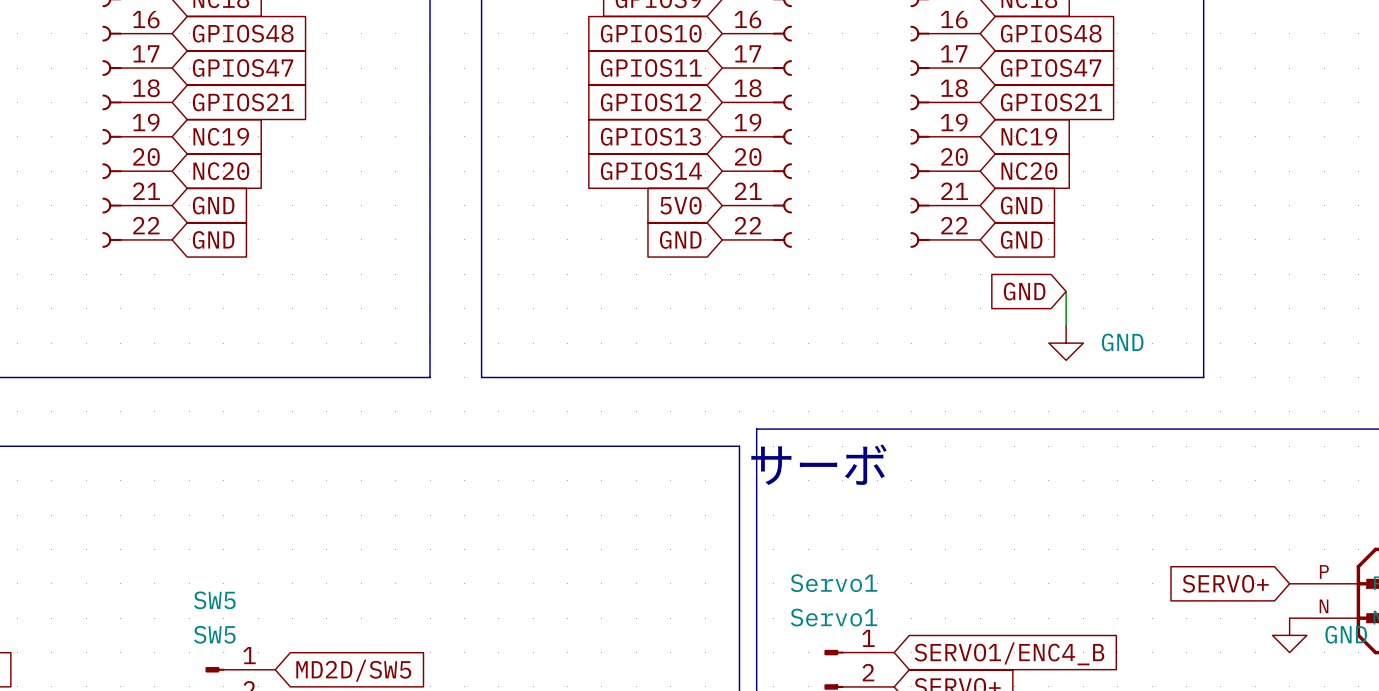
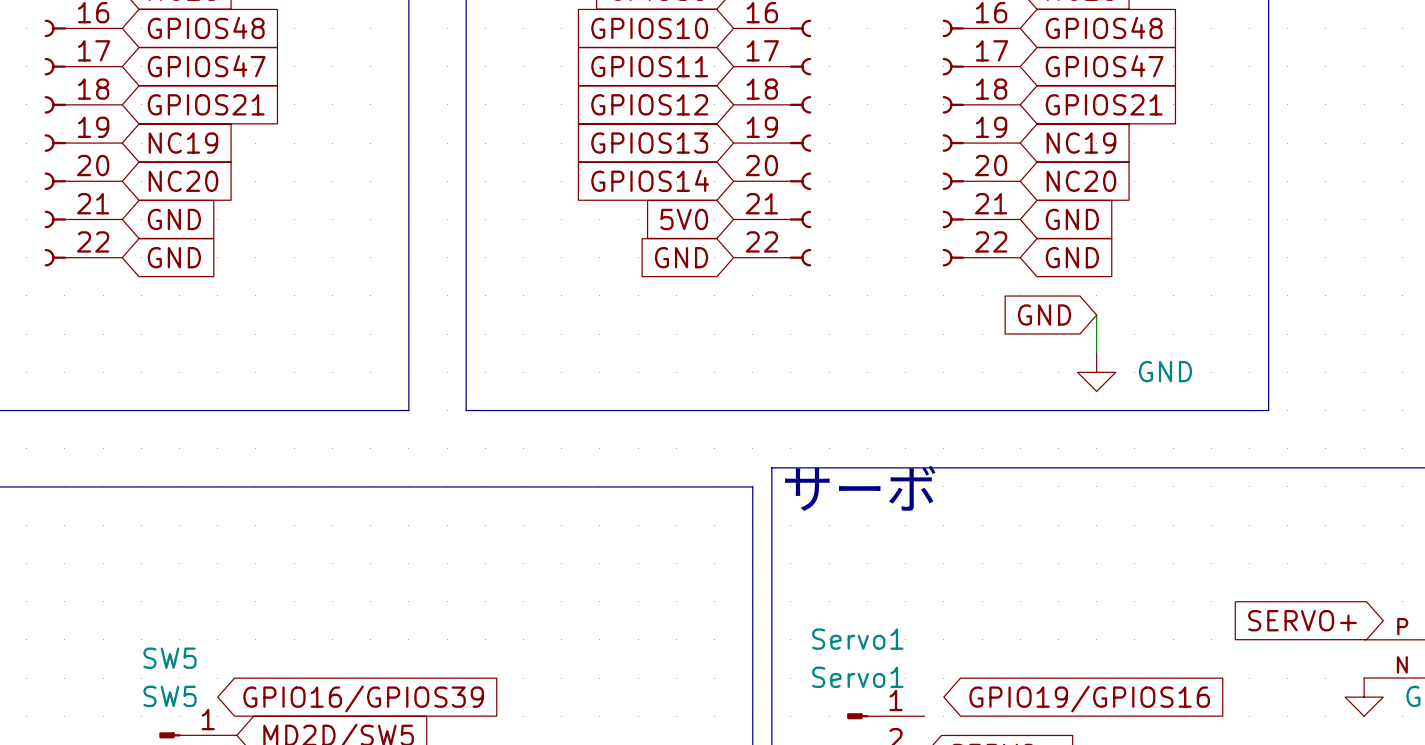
global label position: GND (1024, 291) -> GND (1044, 315)
wire: (1066, 291) (1066, 325) -> (1096, 315) (1096, 353)
power symbol position: GND (1066, 343) -> GND (1096, 372)
text position: サーボ (819, 464) -> サーボ (860, 488)
global label position: SERVO+ (1225, 583) -> SERVO+ (1302, 620)
global label: none -> GPIO16/GPIOS39 (363, 698)
global label: none -> GPIO19/GPIOS16 (1089, 698)
global label: SERVO1/ENC4_B (1009, 653) -> none

